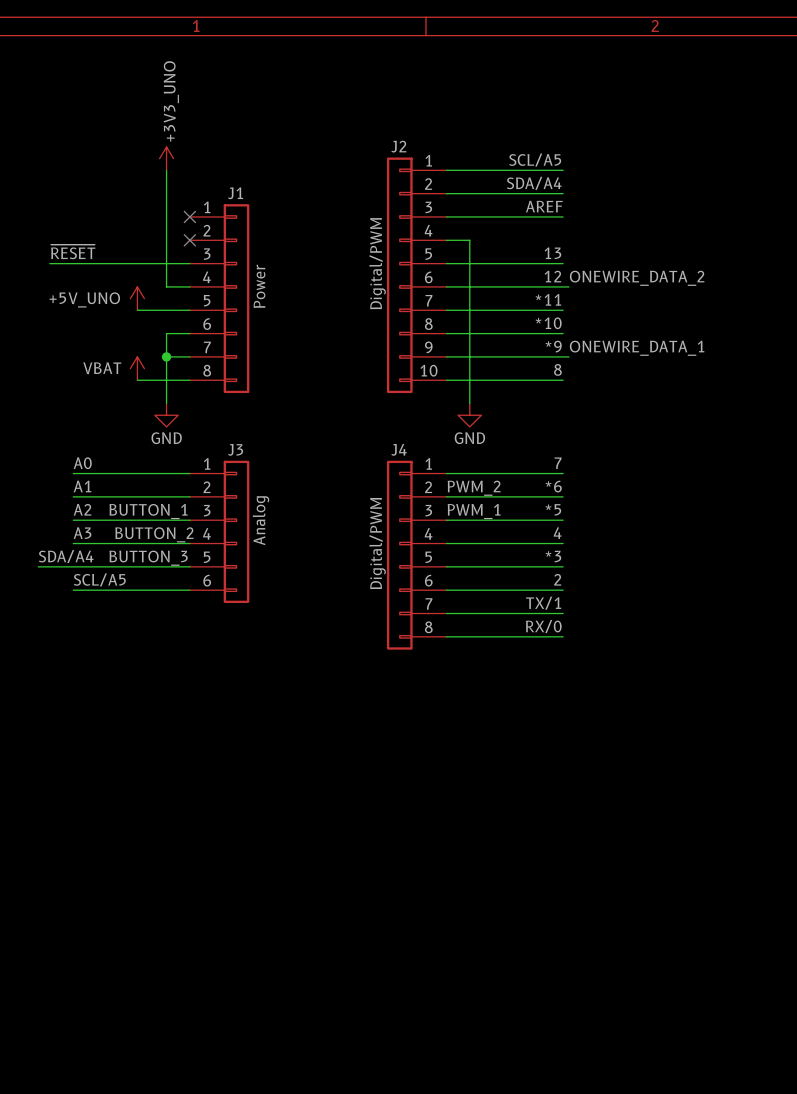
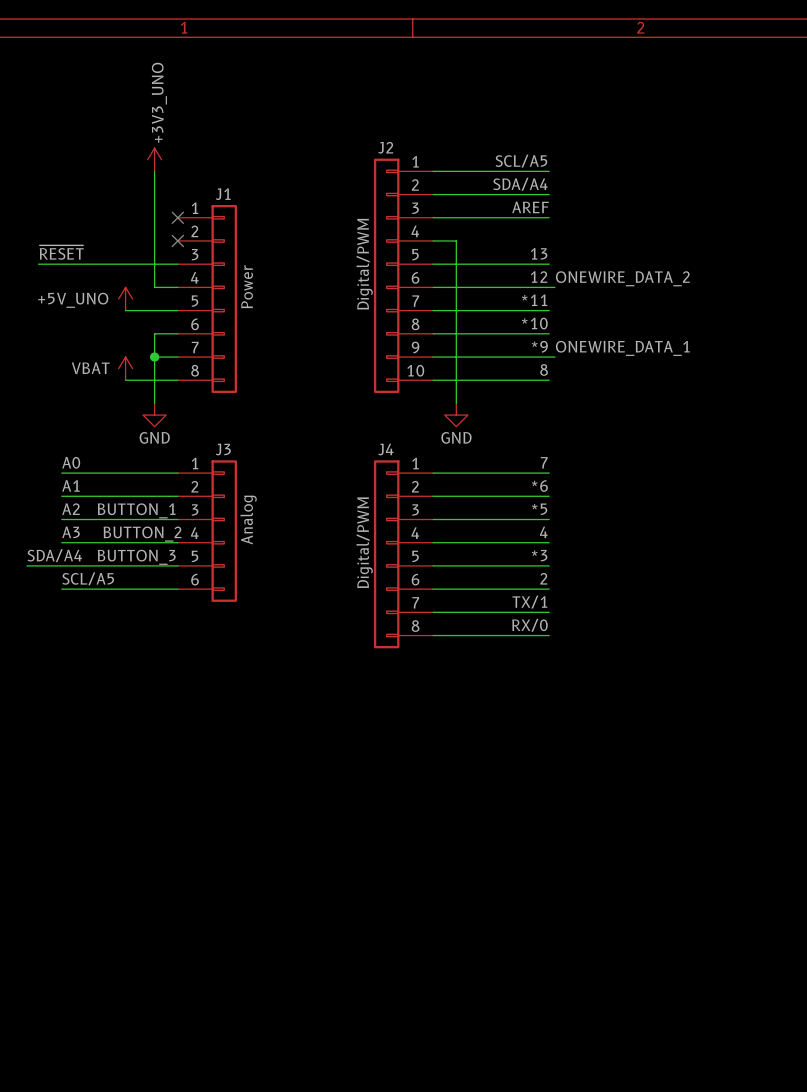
label: PWM_2 (474, 488) -> none
label: PWM_1 (474, 511) -> none

